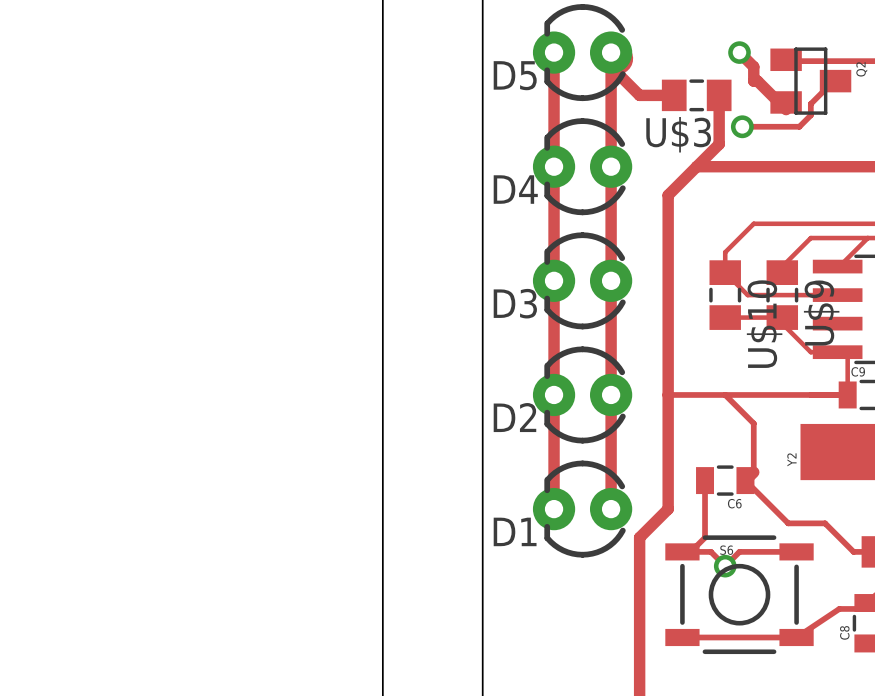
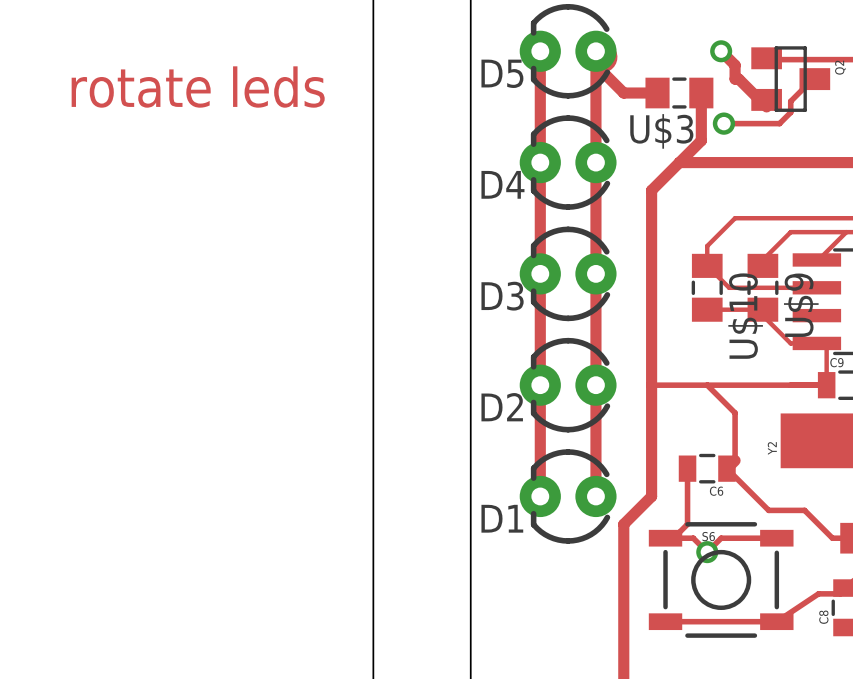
text: none -> rotate leds (198, 87)

